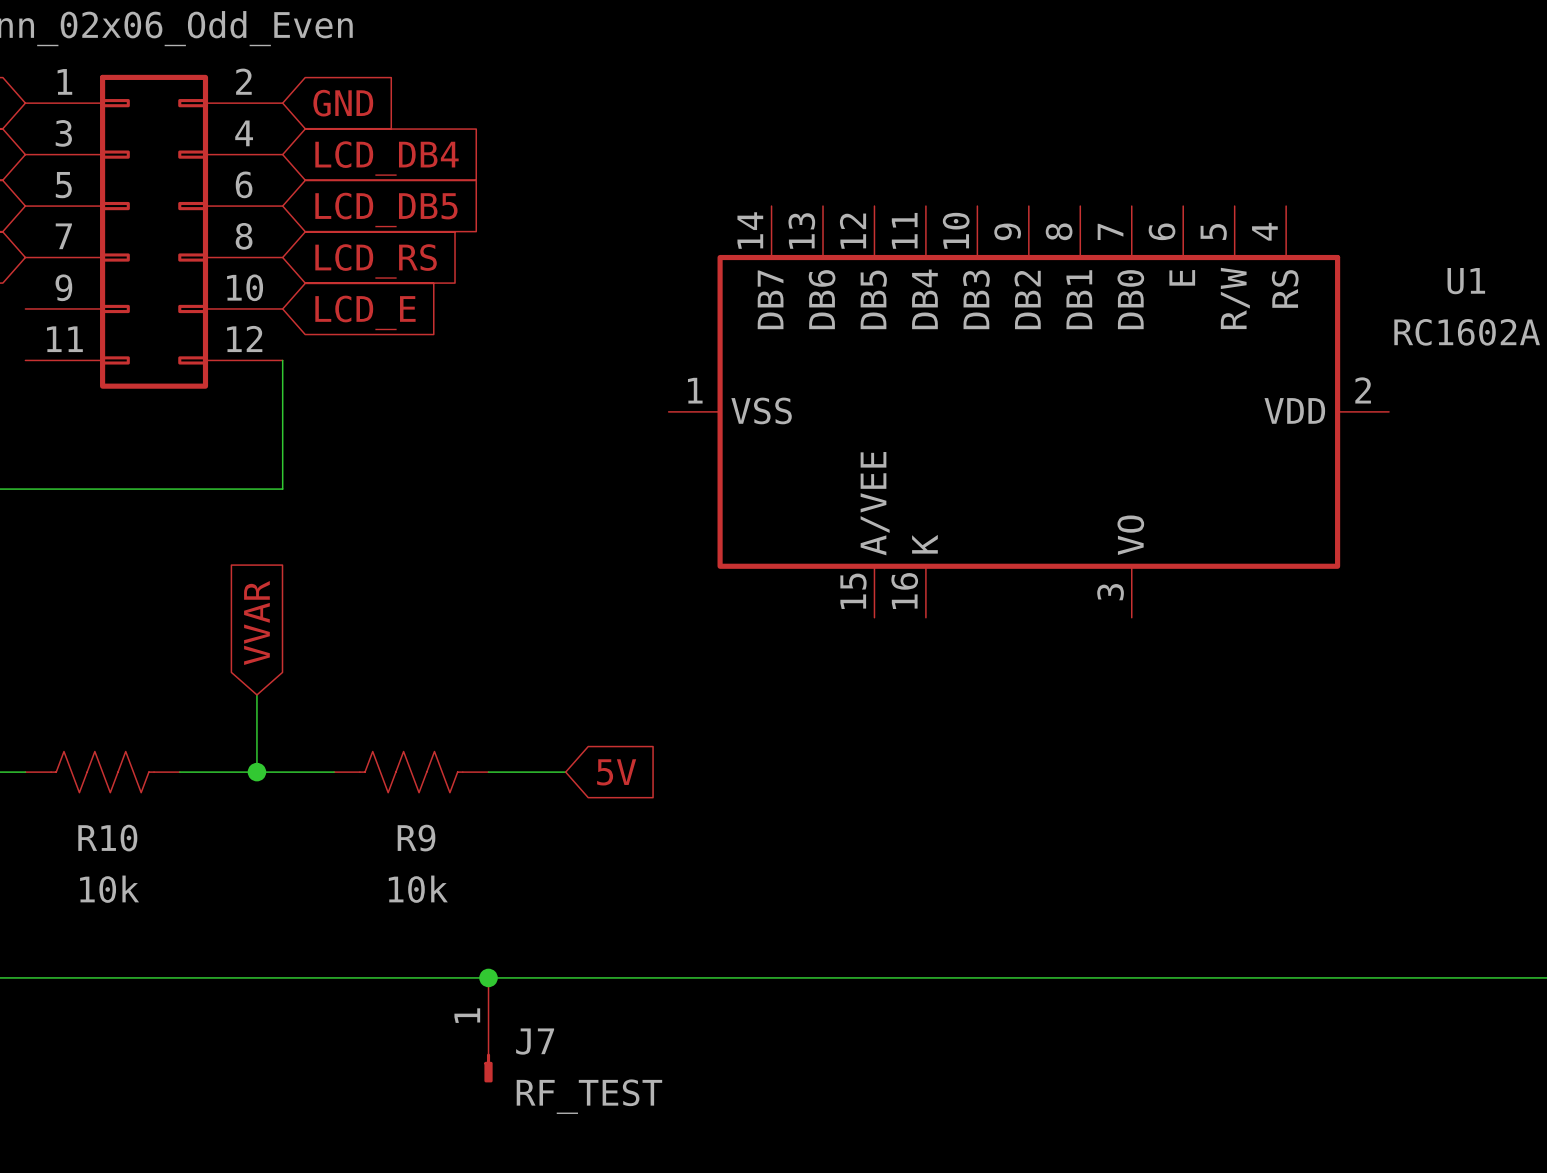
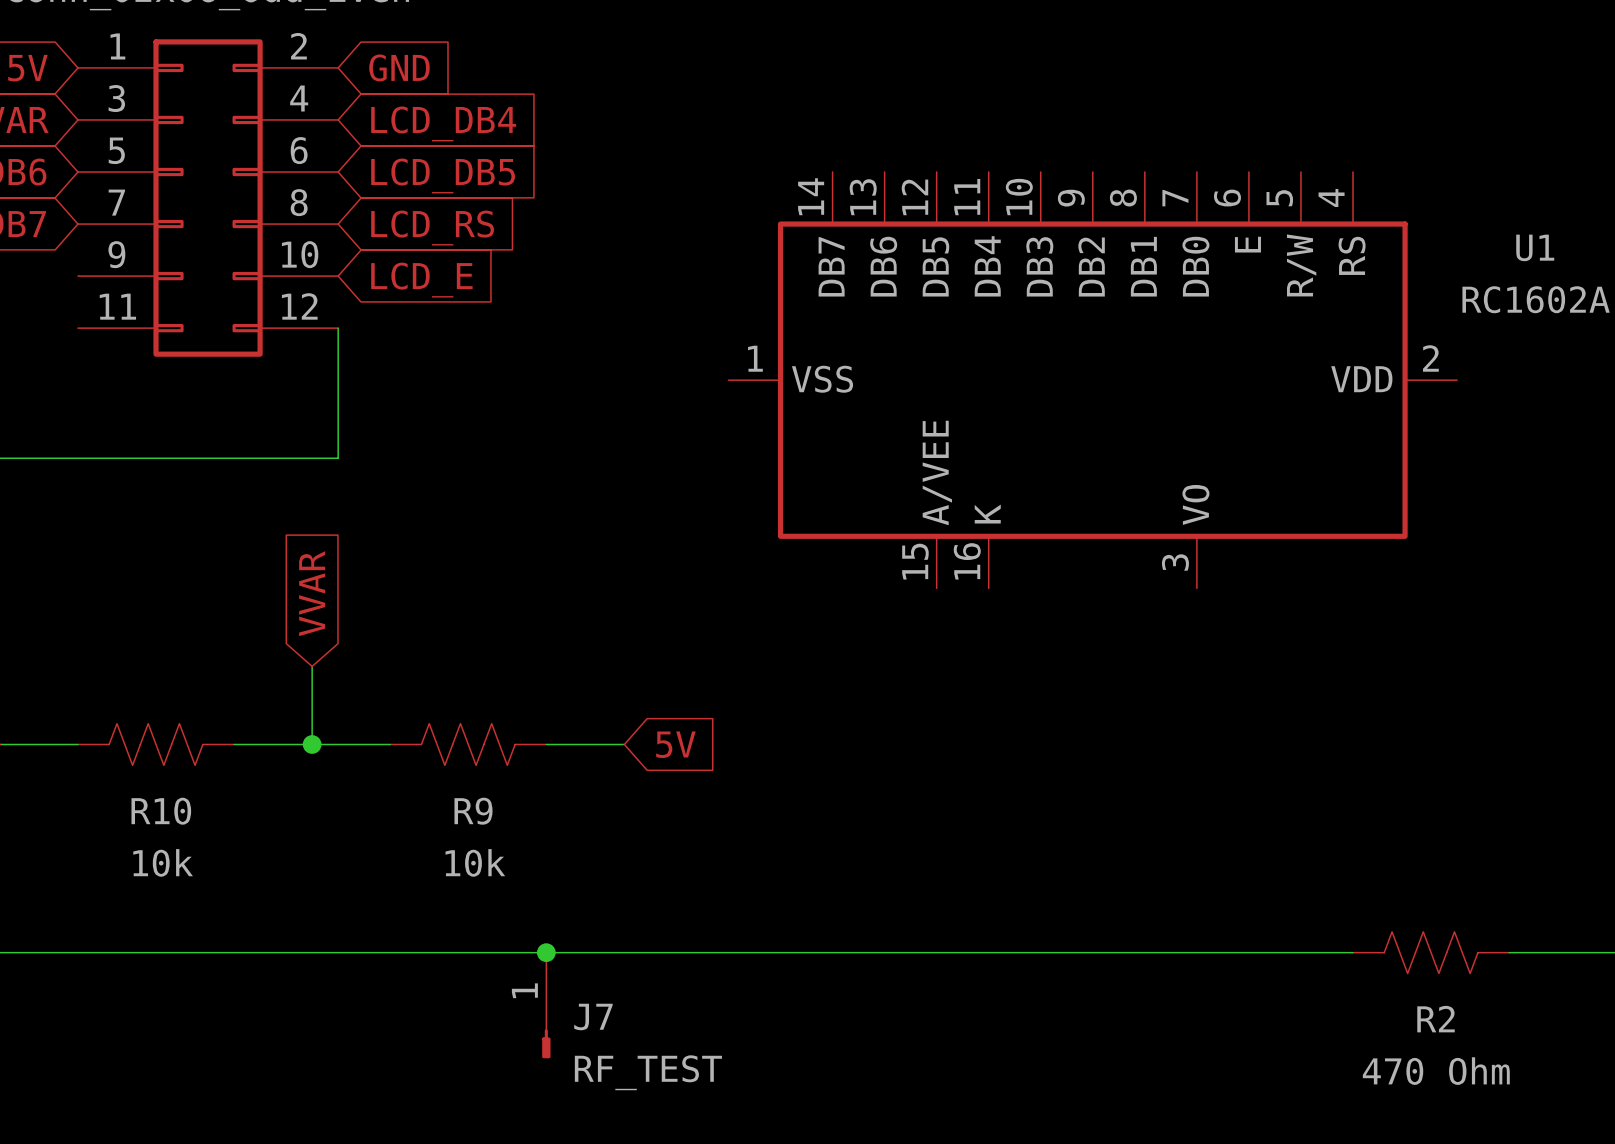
wire: (1286, 977) (1440, 977) -> none
R2: none -> 470 Ohm (1431, 952)

